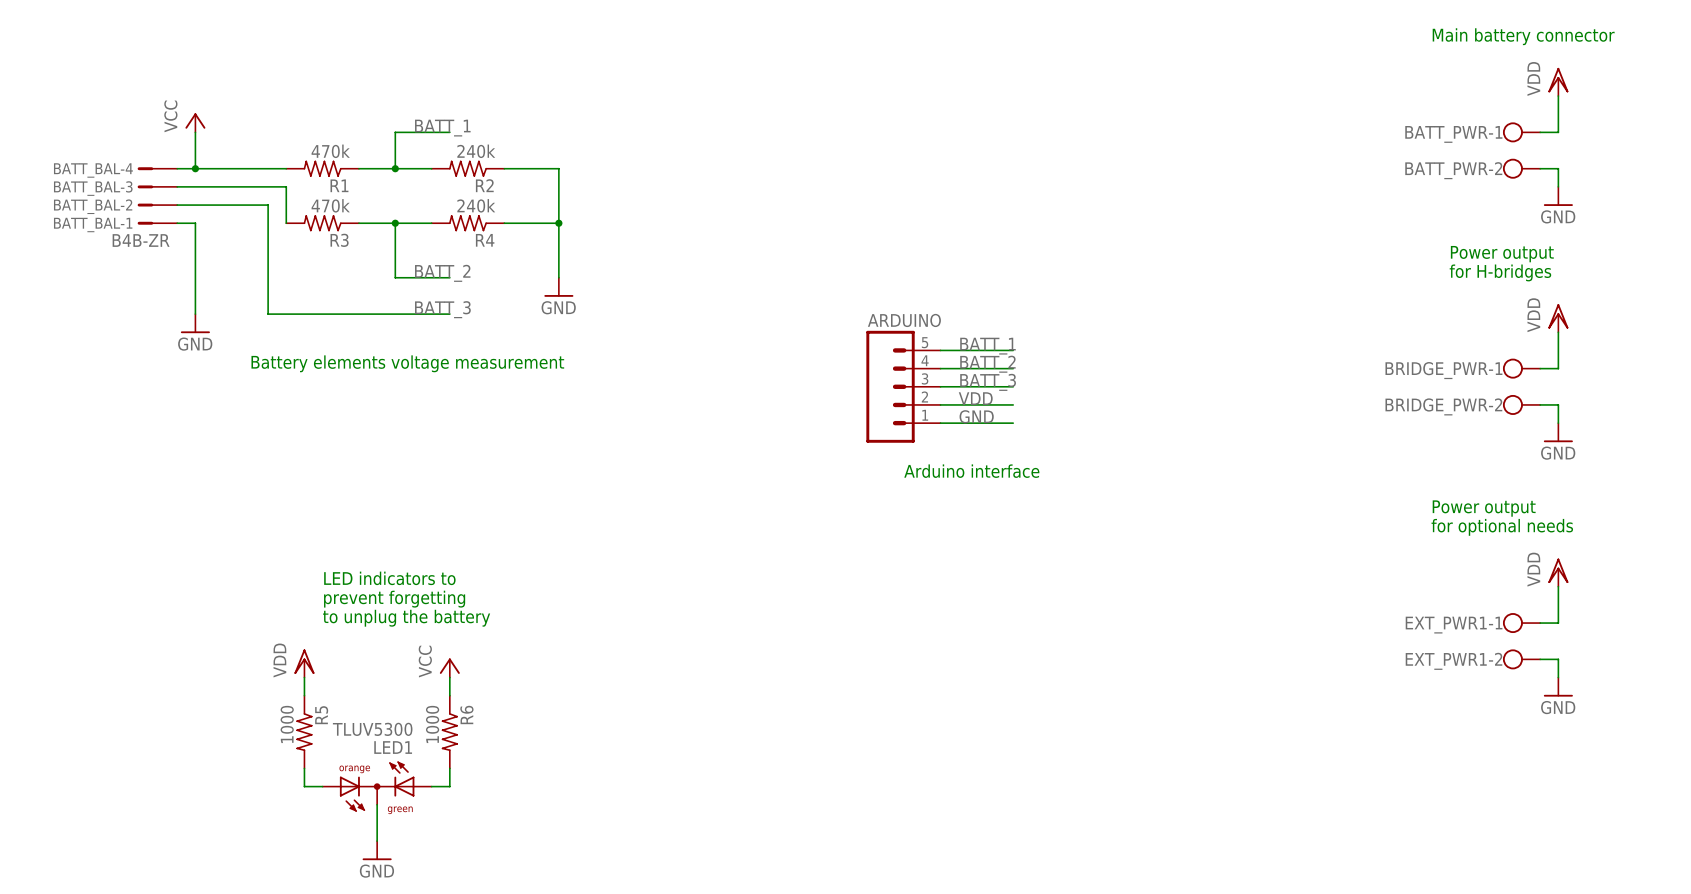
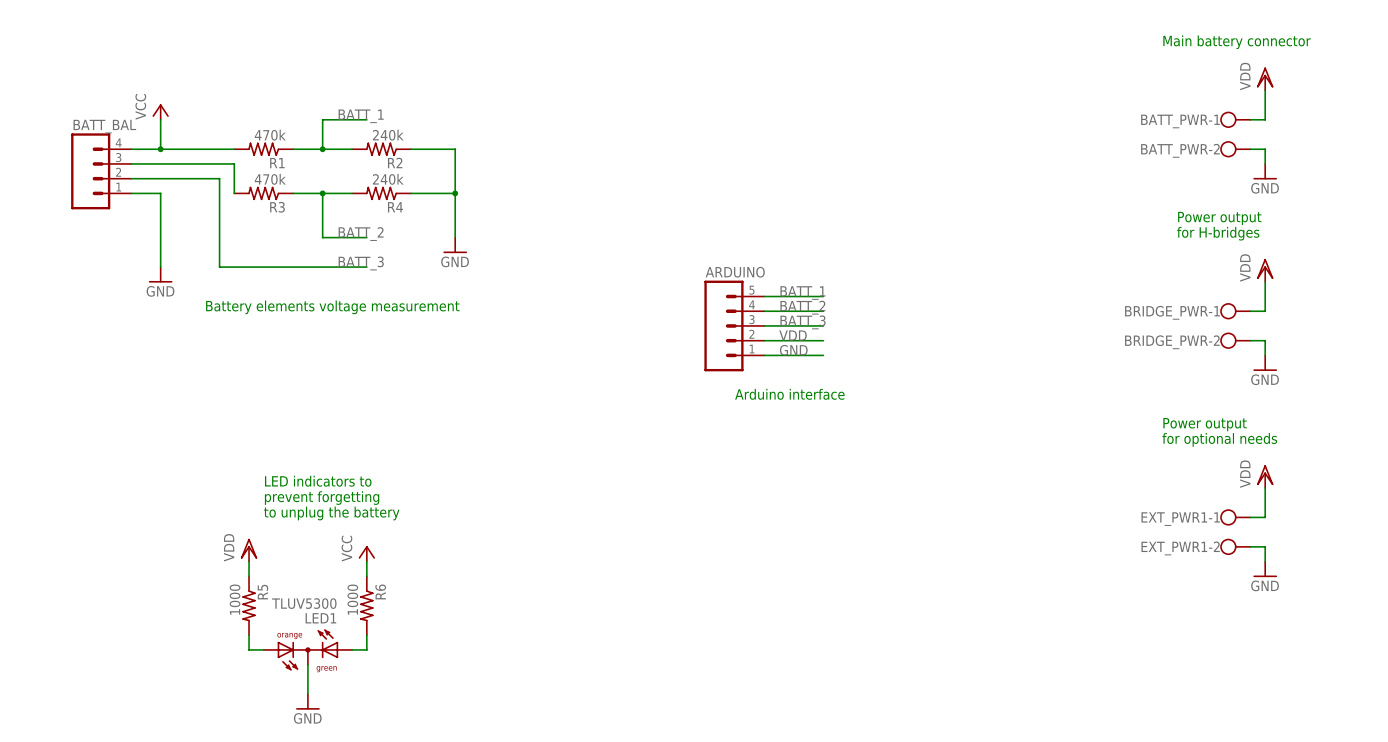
BATT_BAL-4: (157, 168) -> none
BATT_BAL-3: (157, 186) -> none
BATT_BAL: none -> (101, 171)
BATT_BAL-2: (157, 205) -> none
BATT_BAL-1: B4B-ZR (157, 223) -> none

